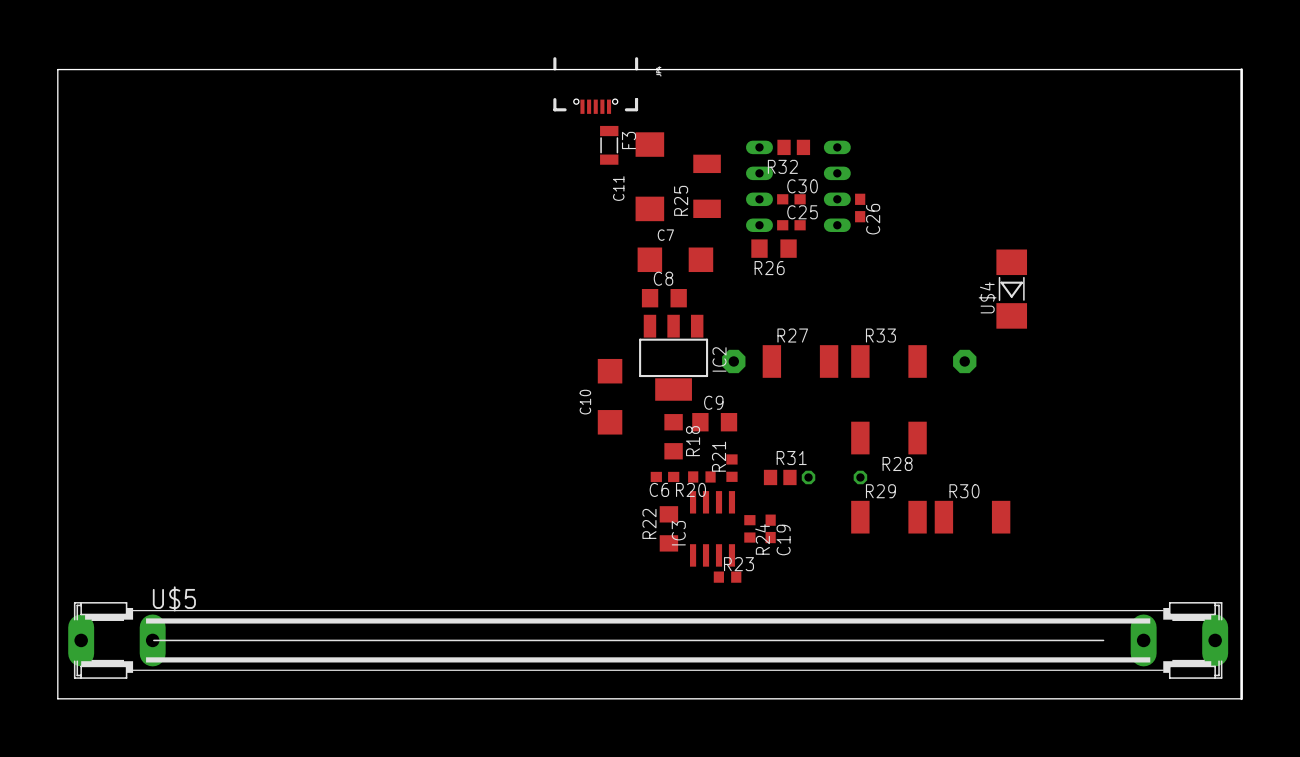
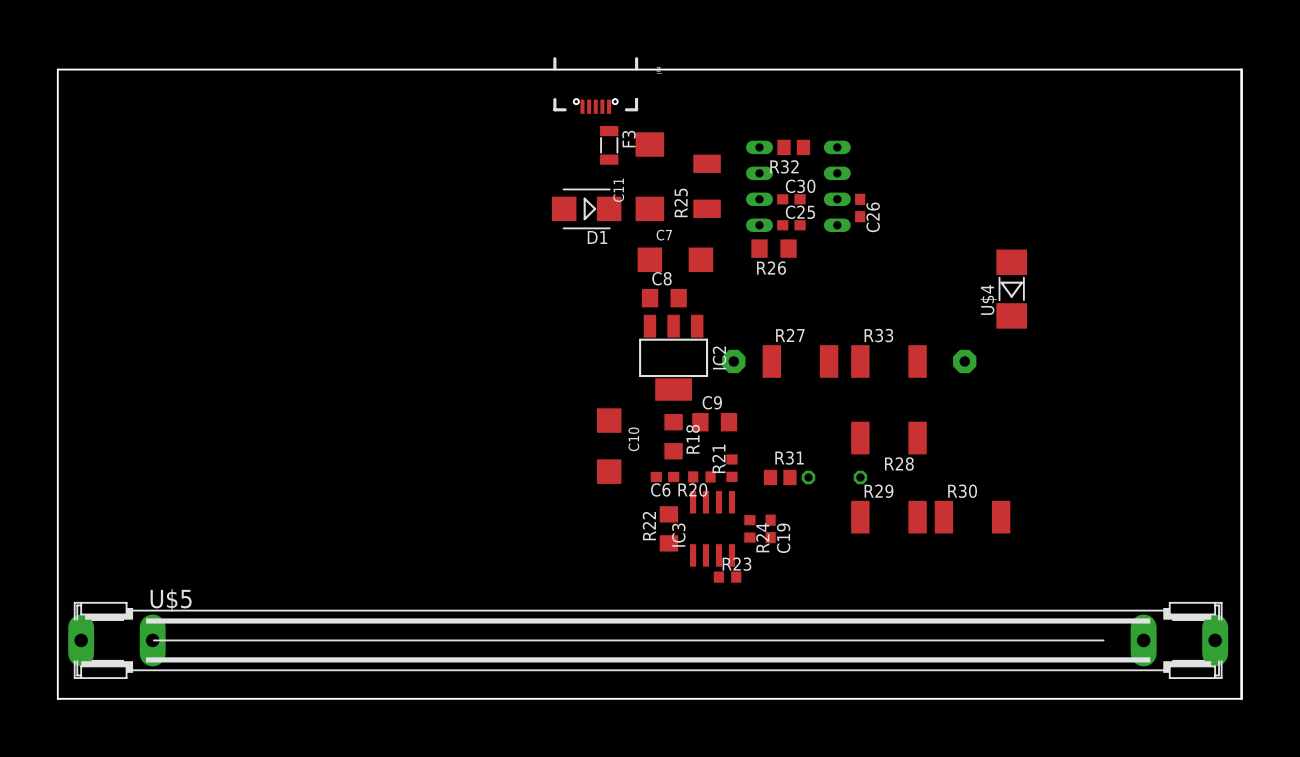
D1: none -> (586, 208)
C10 position: (610, 396) -> (609, 446)
C10 name position: C10 (585, 402) -> C10 (633, 439)

